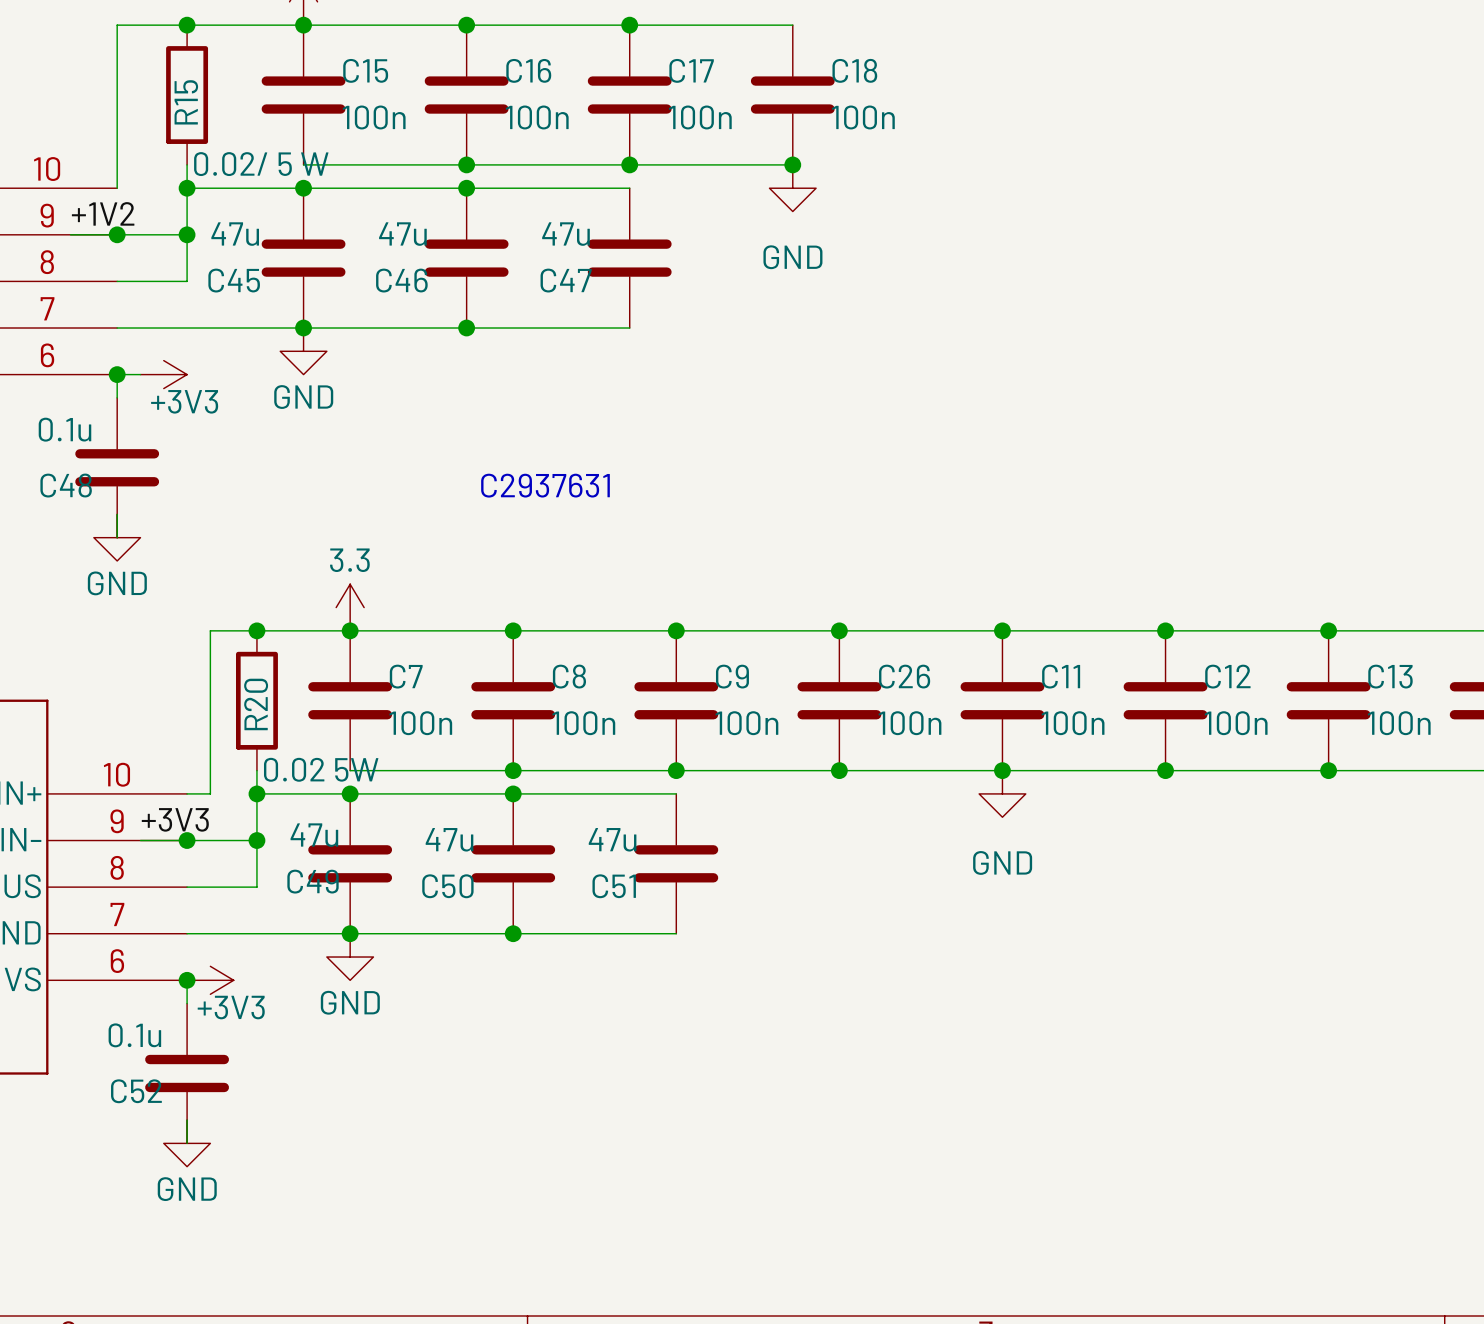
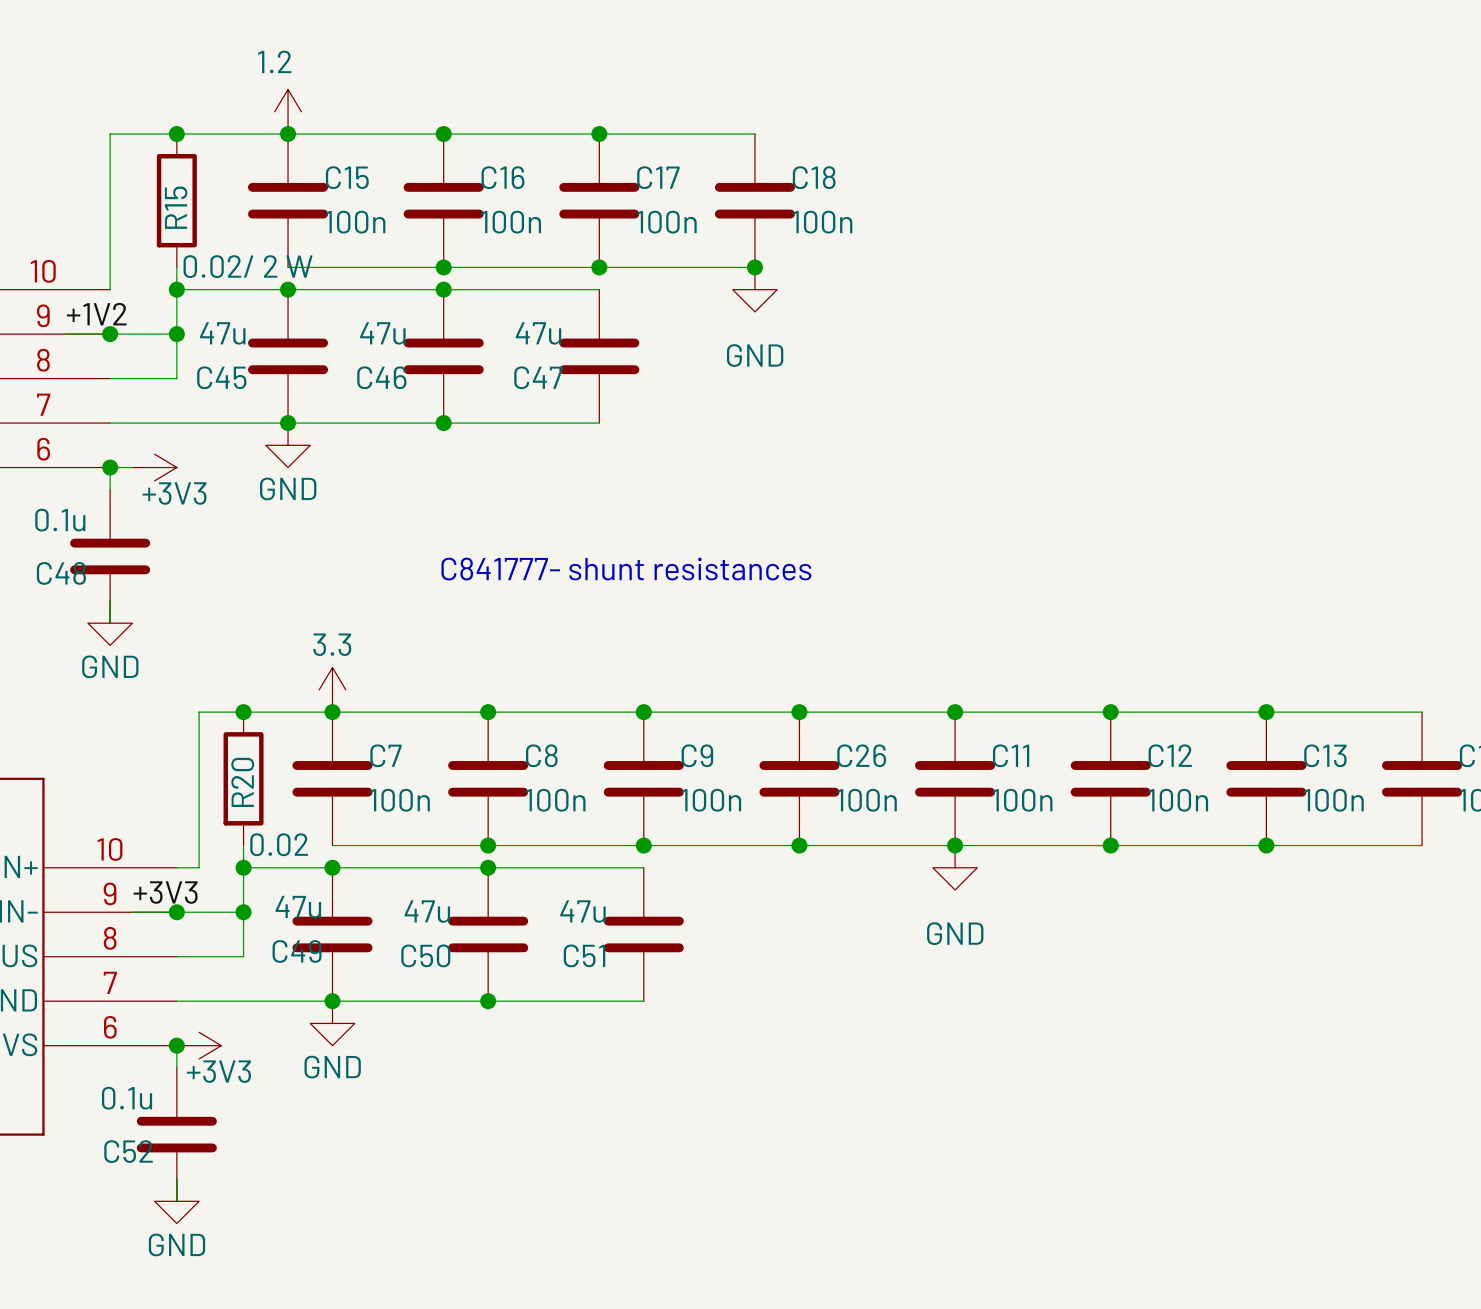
R15 value: 0.02/ 5 W (261, 164) -> 0.02/ 2 W (248, 266)
text: none -> C841777- shunt resistances (626, 569)
text: C2937631 (545, 485) -> none
R20 value: 0.02 5W (321, 769) -> 0.02 (279, 844)

